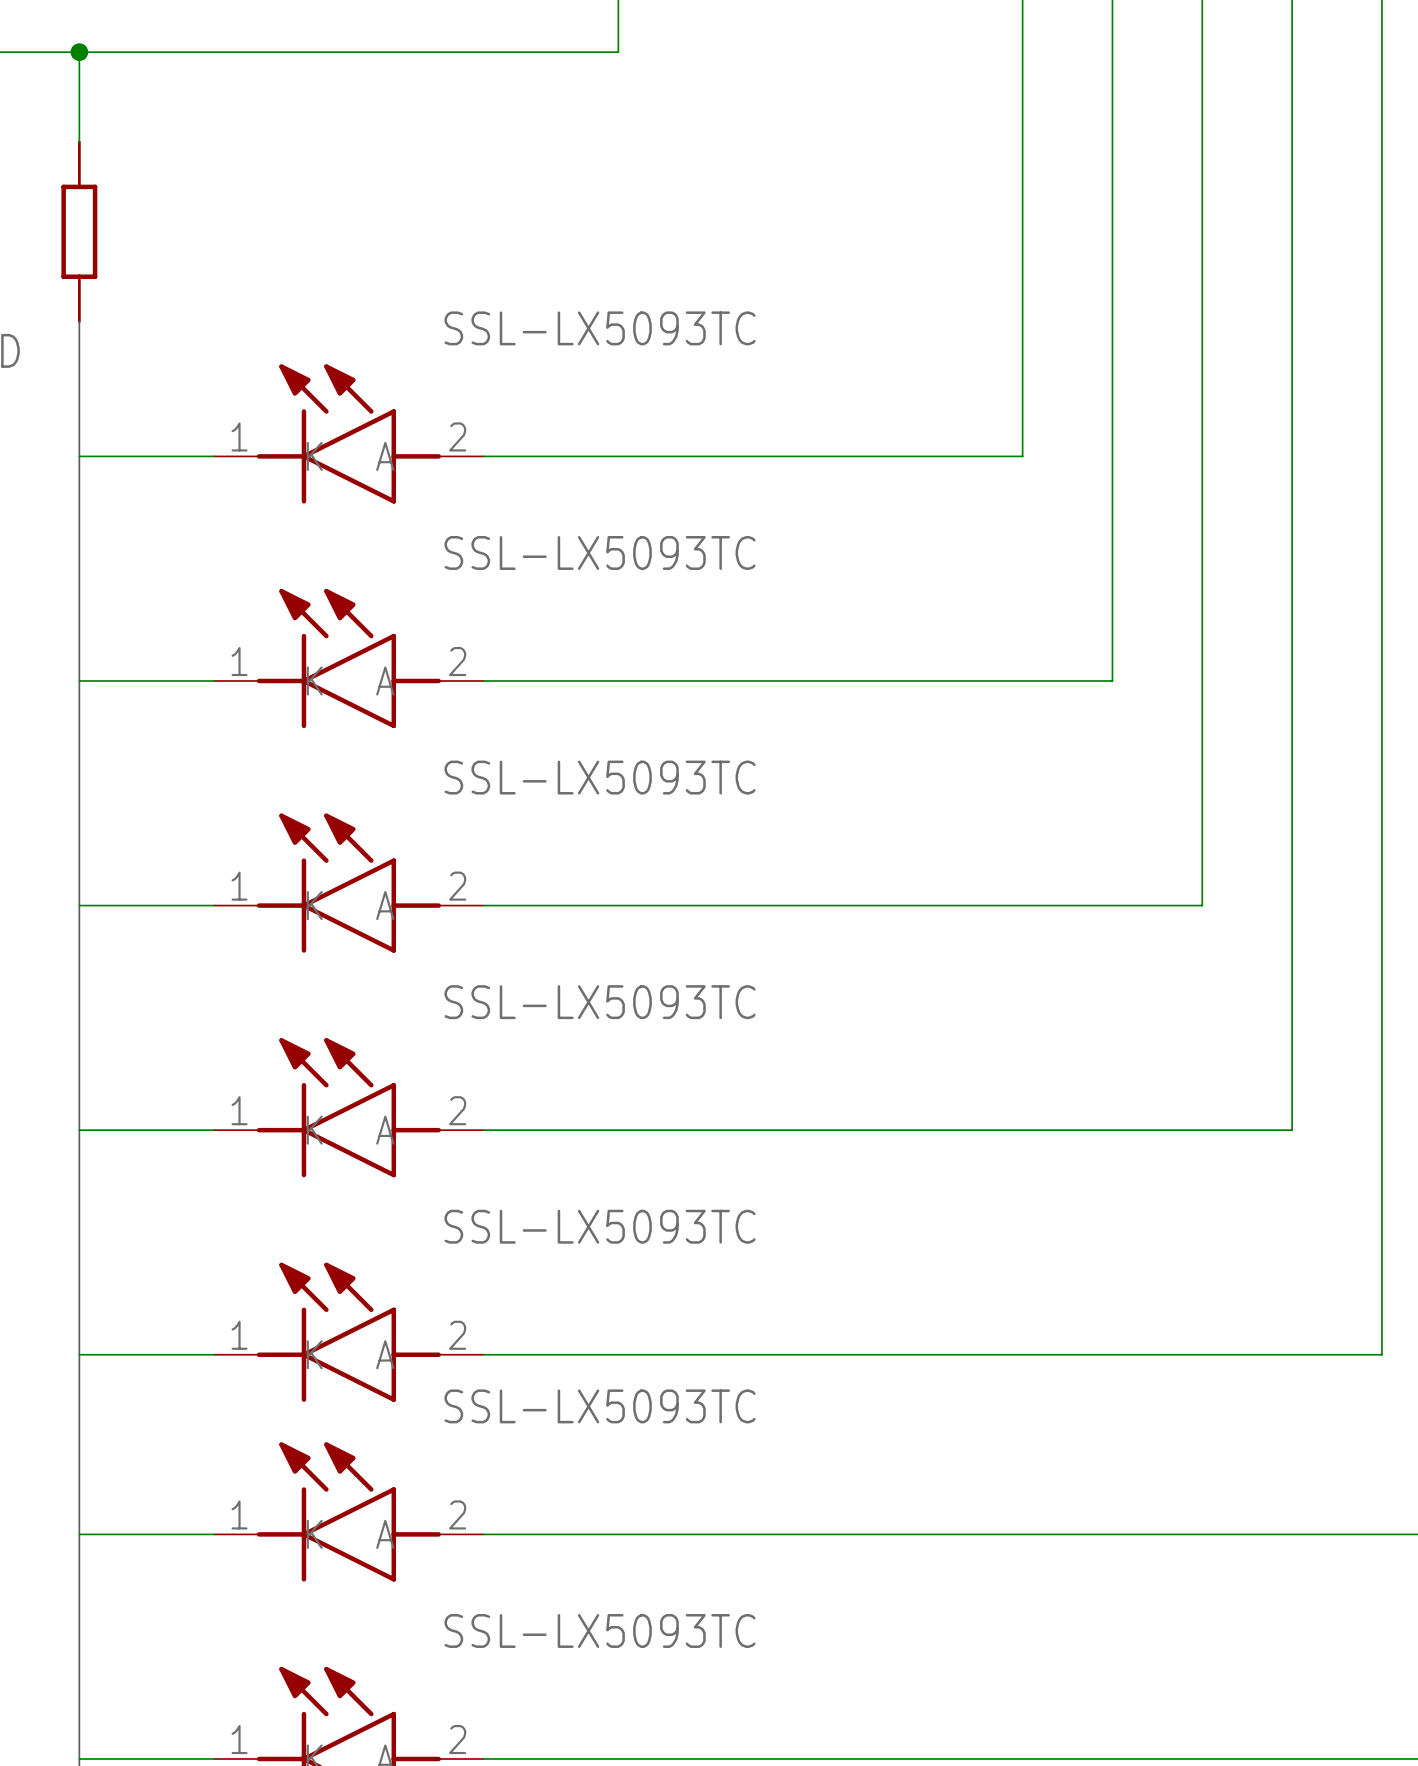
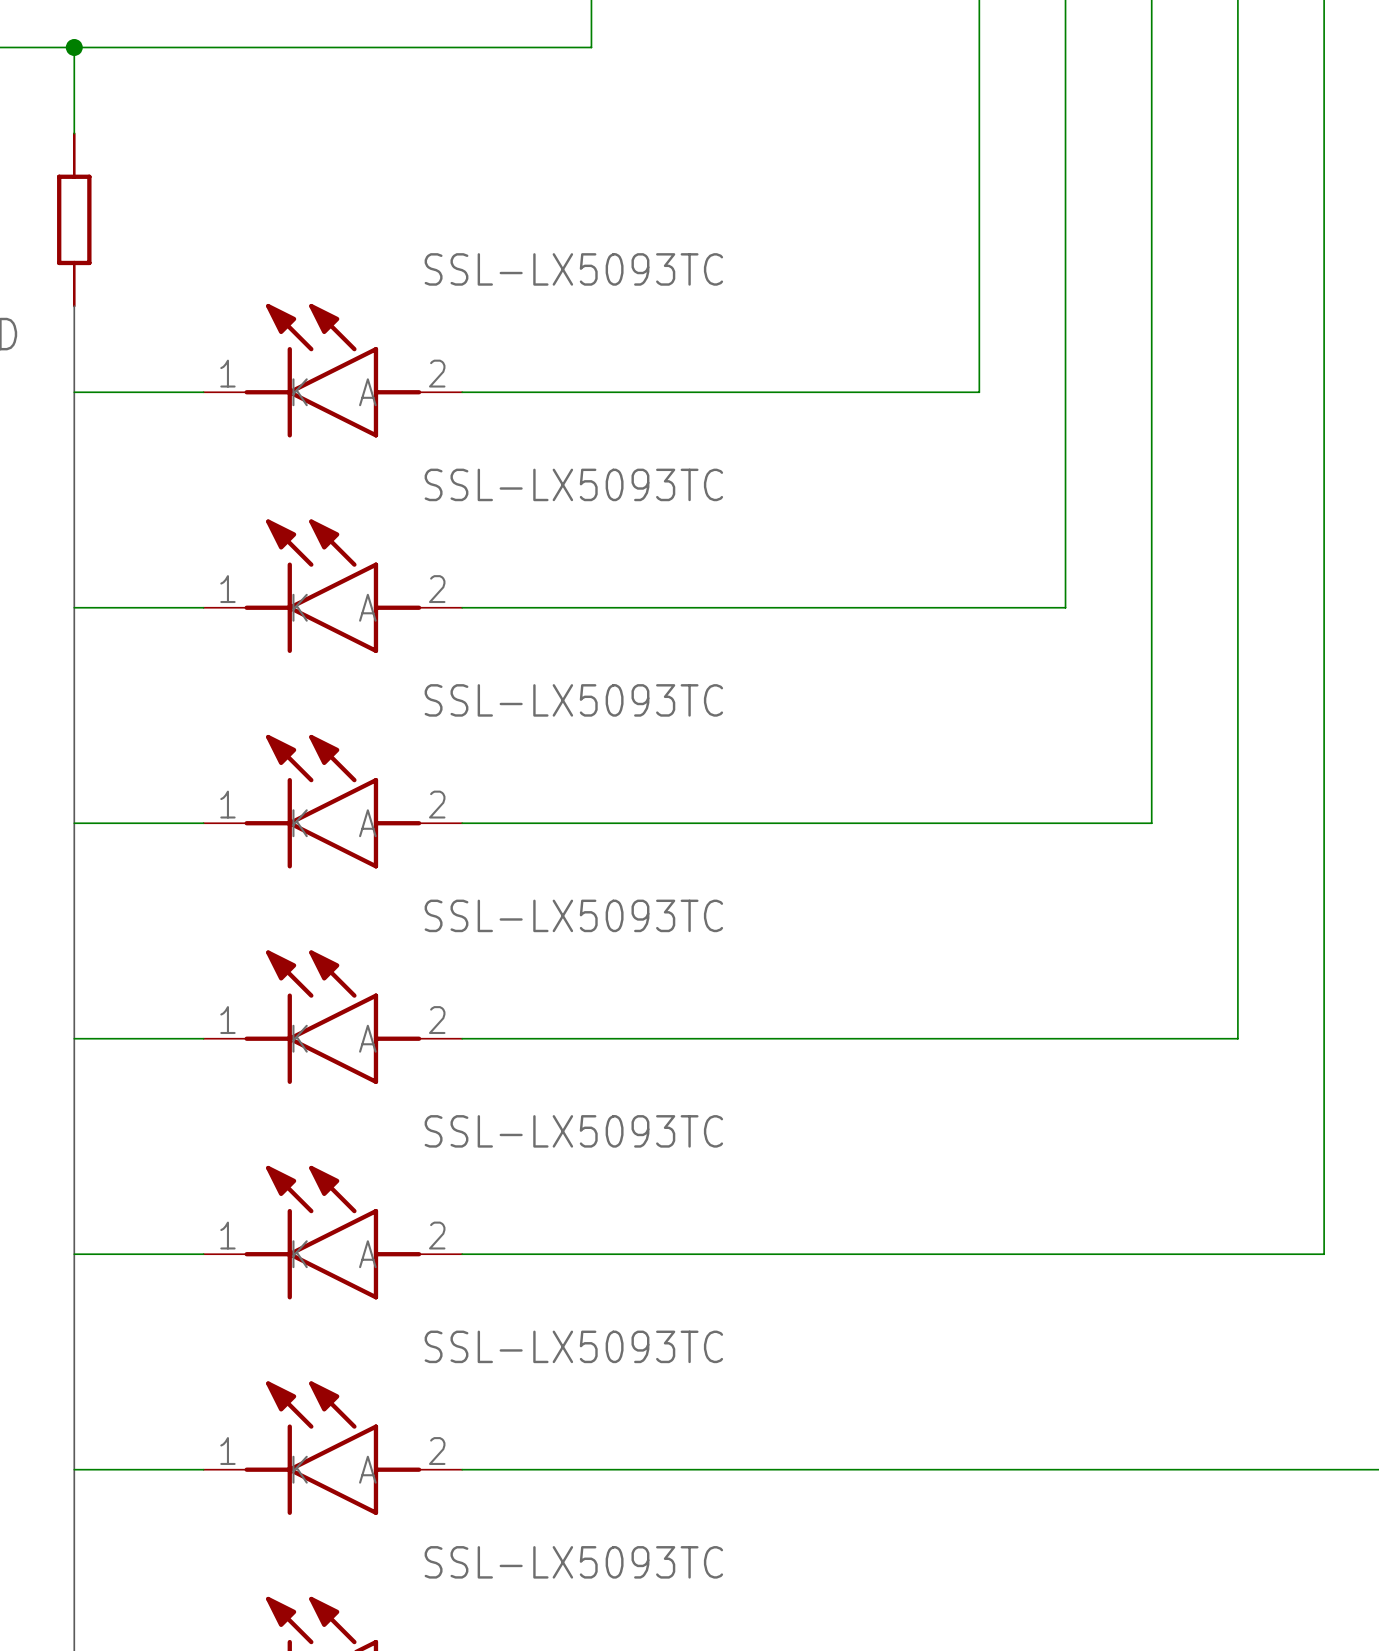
wire: (1022, 411) (1022, 456) (483, 456) -> (979, 392) (462, 392)
part position: (348, 433) -> (332, 370)
wire: (79, 456) (214, 456) -> (74, 392) (203, 392)
wire: (1112, 636) (1112, 680) (483, 680) -> (1065, 607) (462, 607)
part position: (348, 658) -> (332, 586)
wire: (79, 680) (214, 680) -> (74, 607) (203, 607)
wire: (1202, 860) (1202, 905) (483, 905) -> (1151, 823) (462, 823)
part position: (348, 883) -> (332, 801)
wire: (79, 905) (214, 905) -> (74, 823) (203, 823)
wire: (1292, 1085) (1292, 1130) (483, 1130) -> (1237, 1038) (462, 1038)
part position: (348, 1107) -> (332, 1017)
wire: (79, 1130) (214, 1130) -> (74, 1038) (203, 1038)
wire: (1381, 1309) (1381, 1354) (483, 1354) -> (1324, 1254) (462, 1254)
part position: (348, 1332) -> (332, 1232)
wire: (79, 1354) (214, 1354) -> (74, 1254) (203, 1254)

